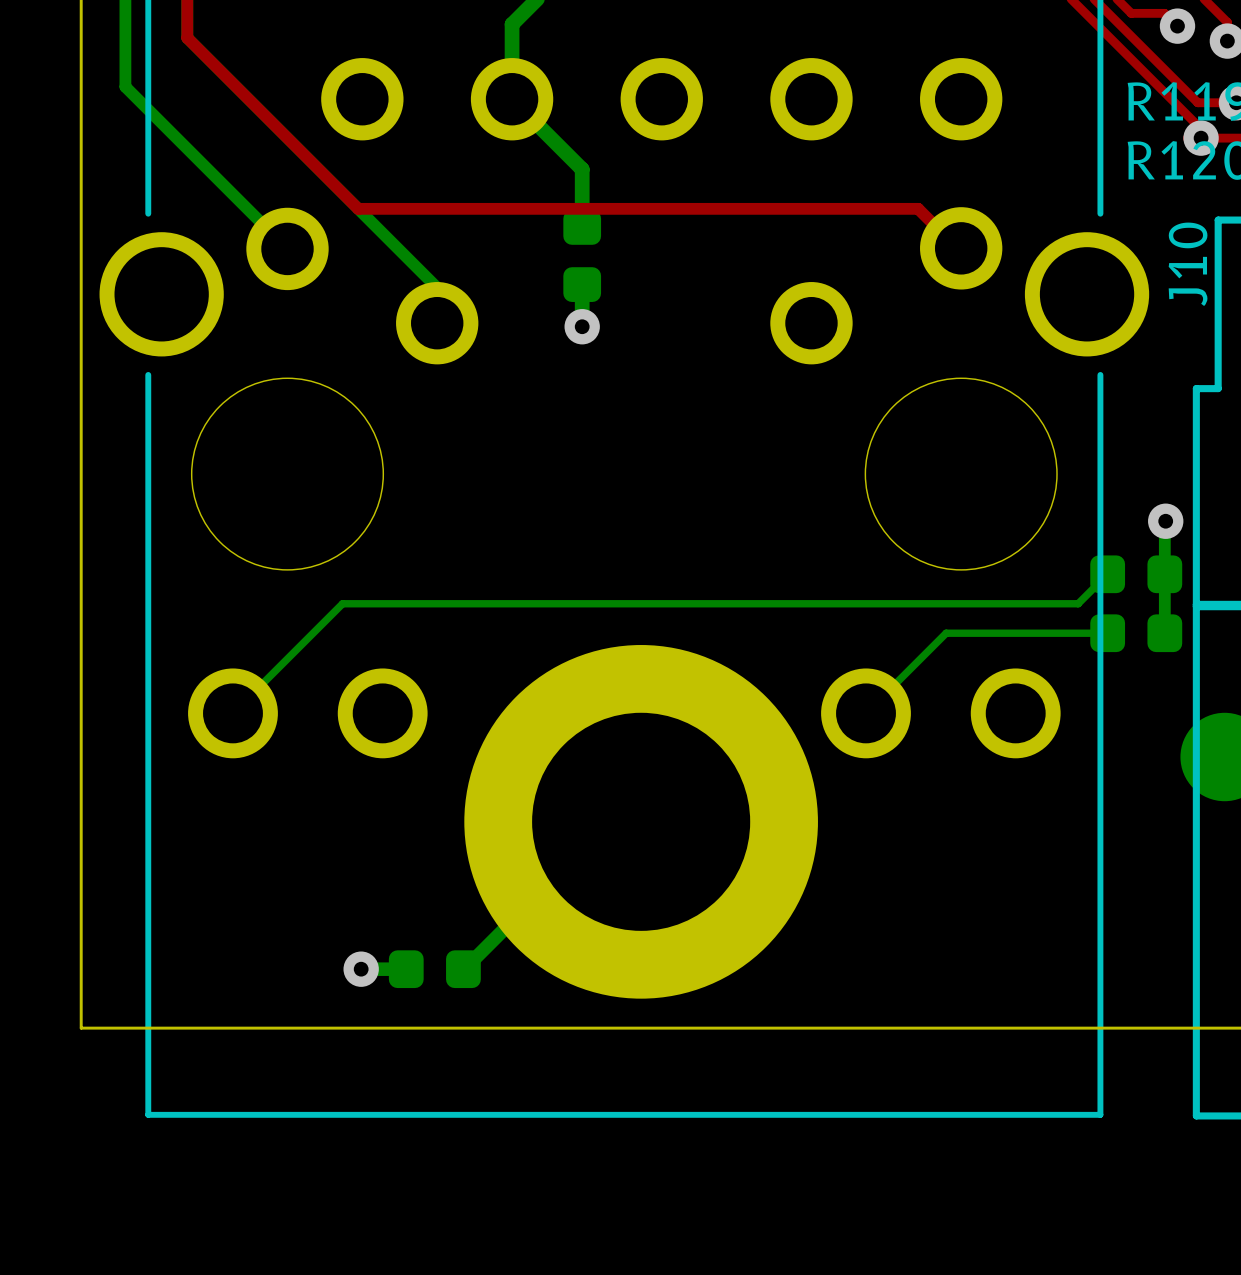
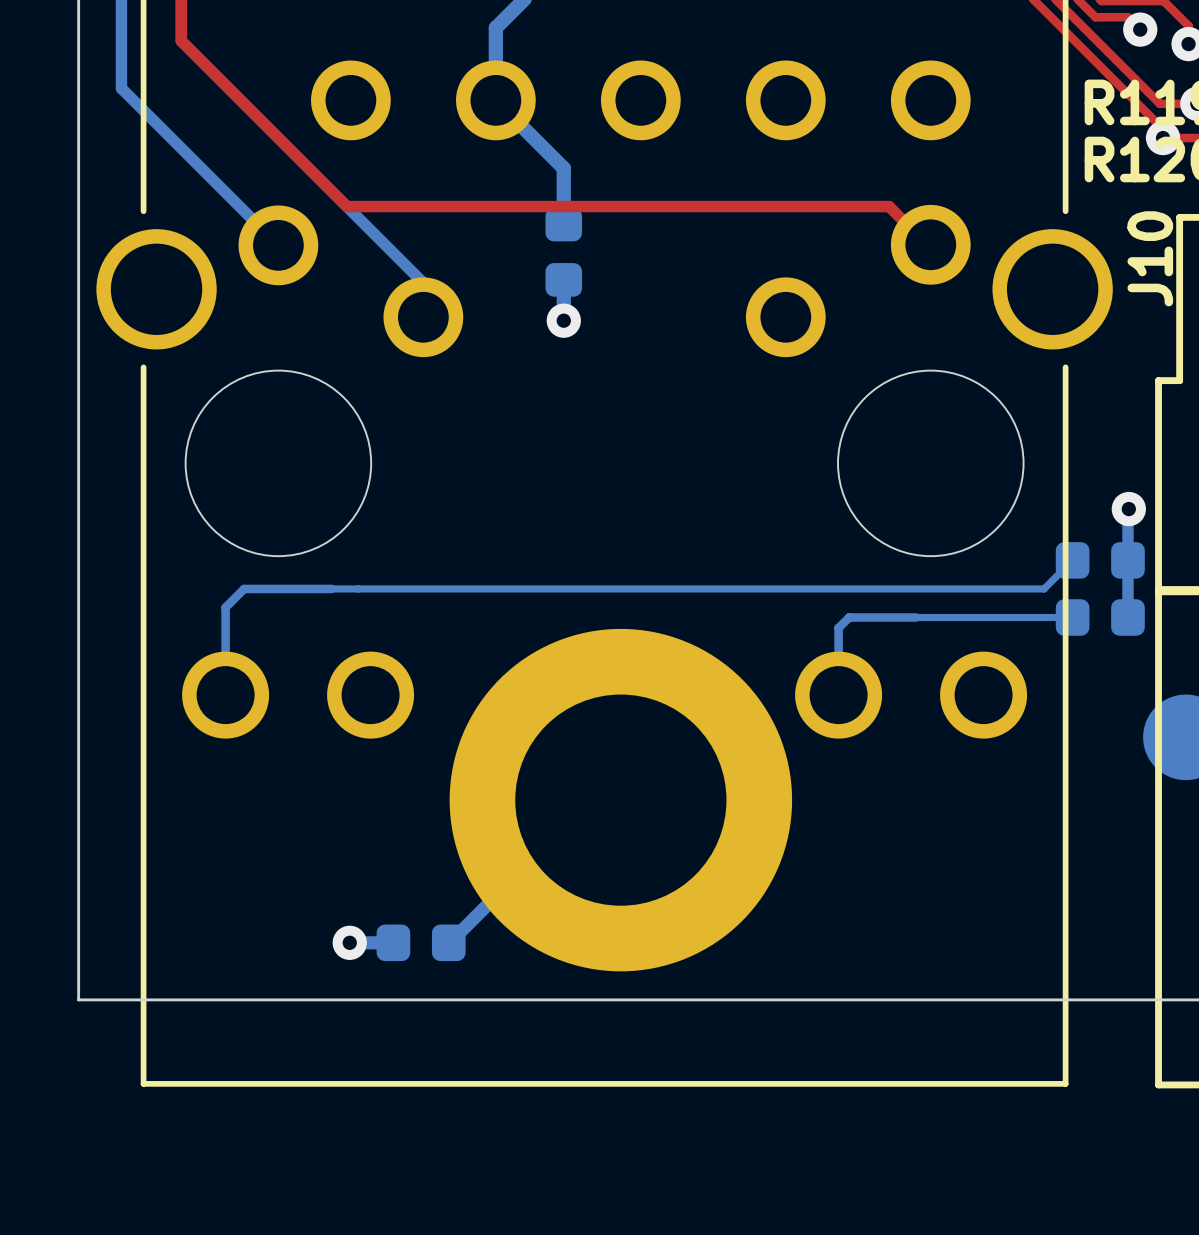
bottom track: (342, 603) (232, 713) -> (331, 588) (244, 588) (225, 607) (225, 695)
bottom track: (946, 633) (866, 713) -> (916, 617) (849, 617) (838, 628) (838, 695)

